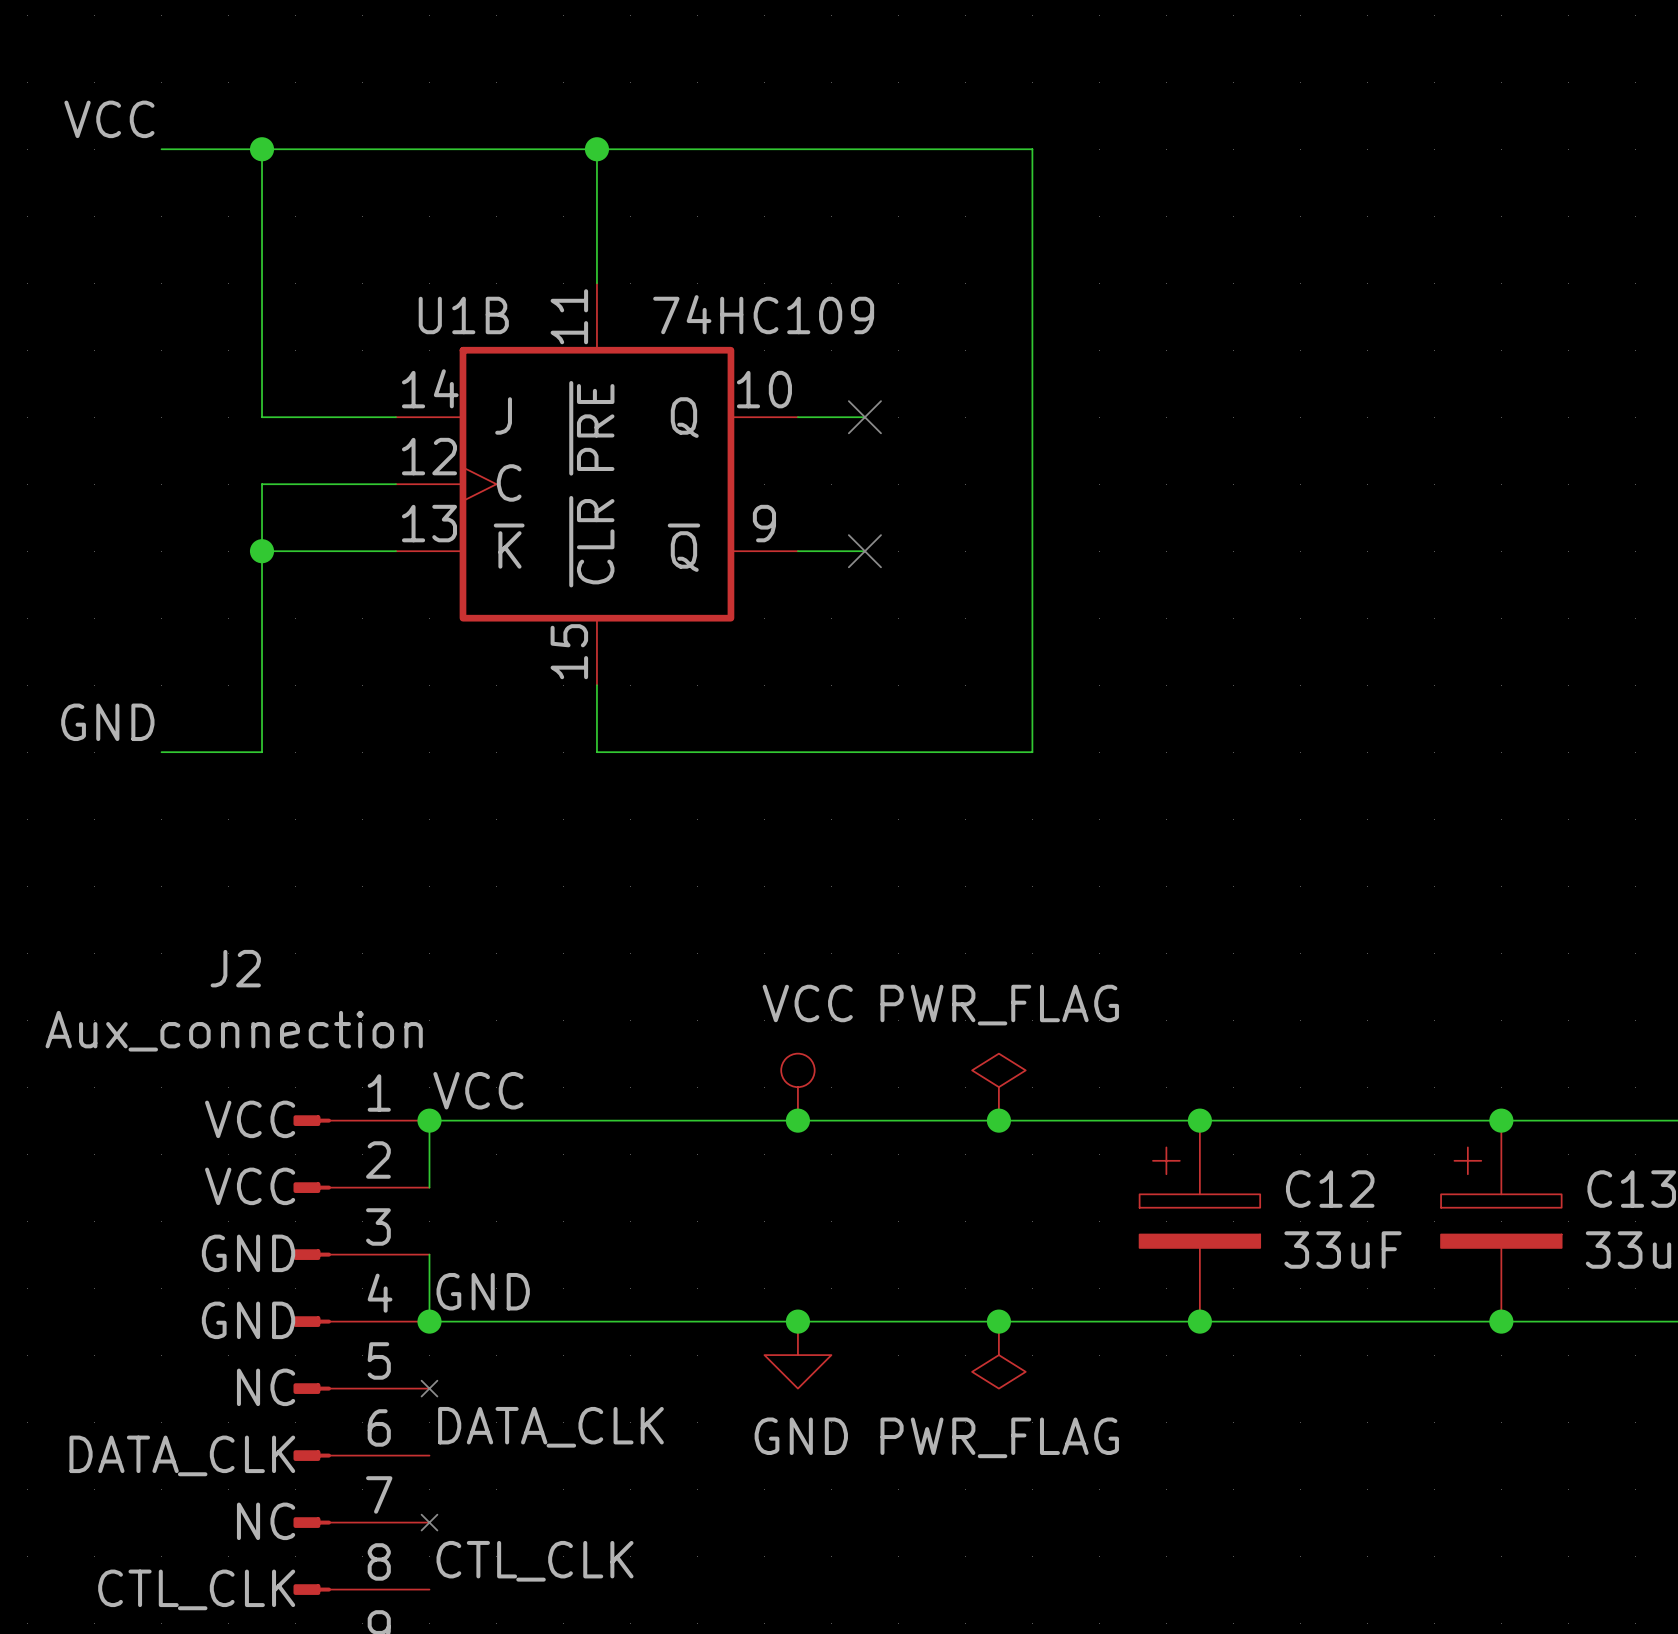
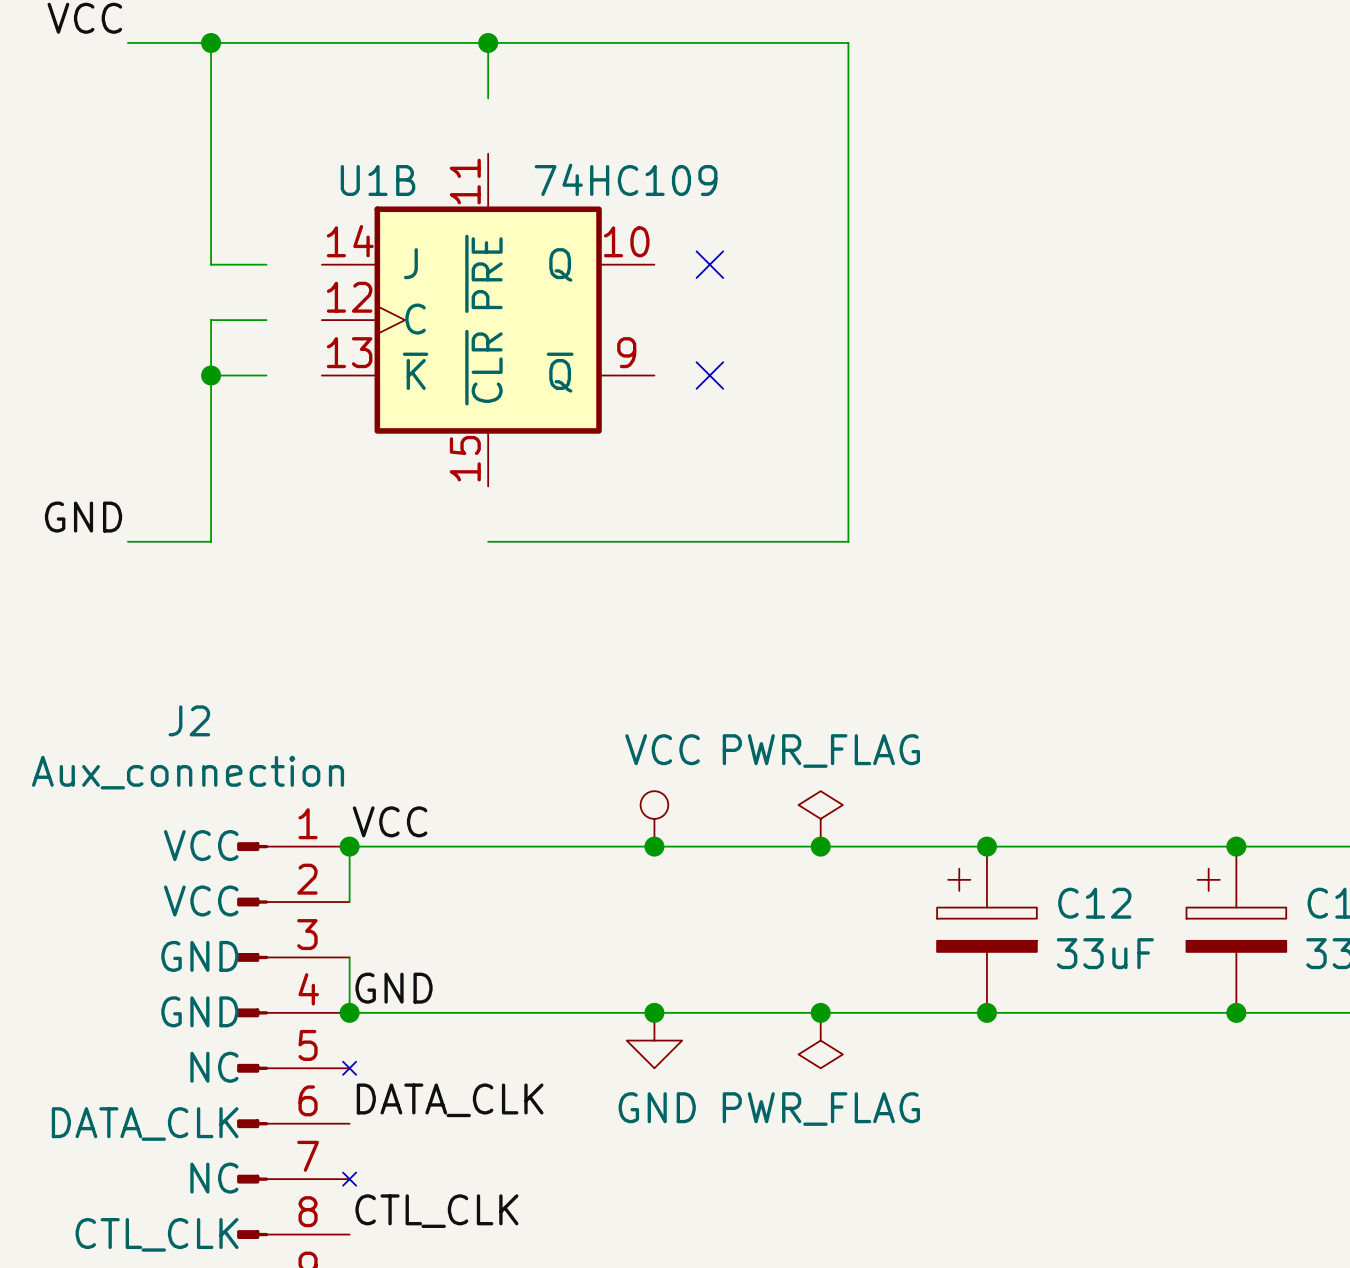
wire: (596, 216) (596, 283) -> none
wire: (329, 417) (395, 417) -> none
wire: (797, 417) (864, 417) -> none
wire: (329, 484) (395, 484) -> none
wire: (329, 551) (395, 551) -> none
wire: (797, 551) (864, 551) -> none
wire: (596, 685) (596, 752) -> none

